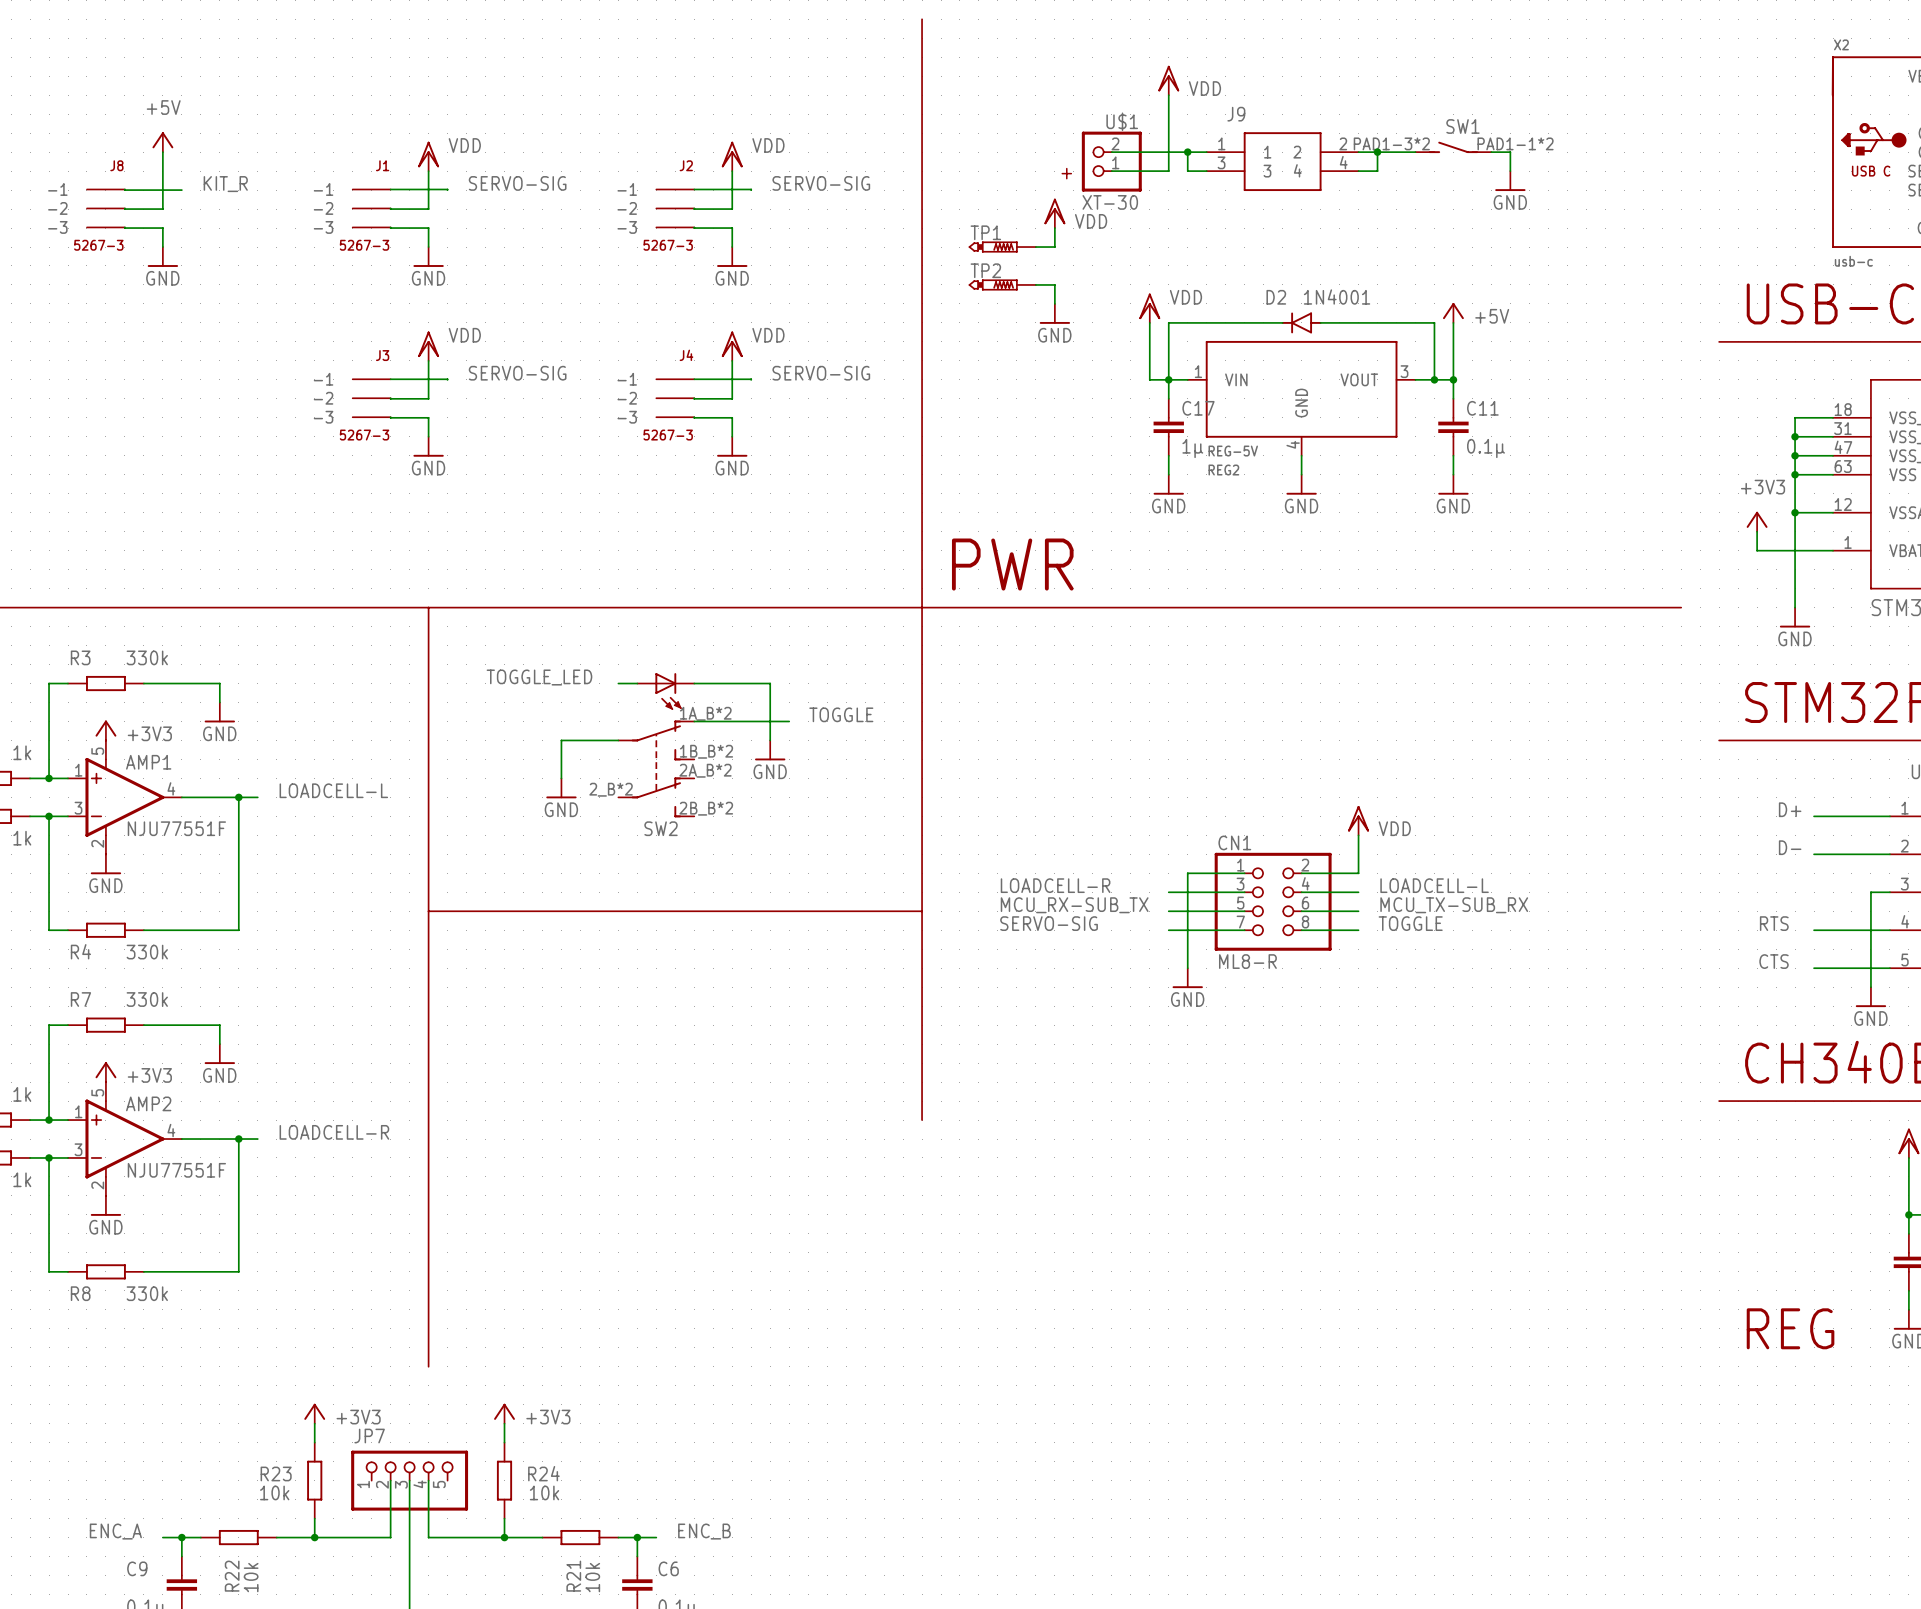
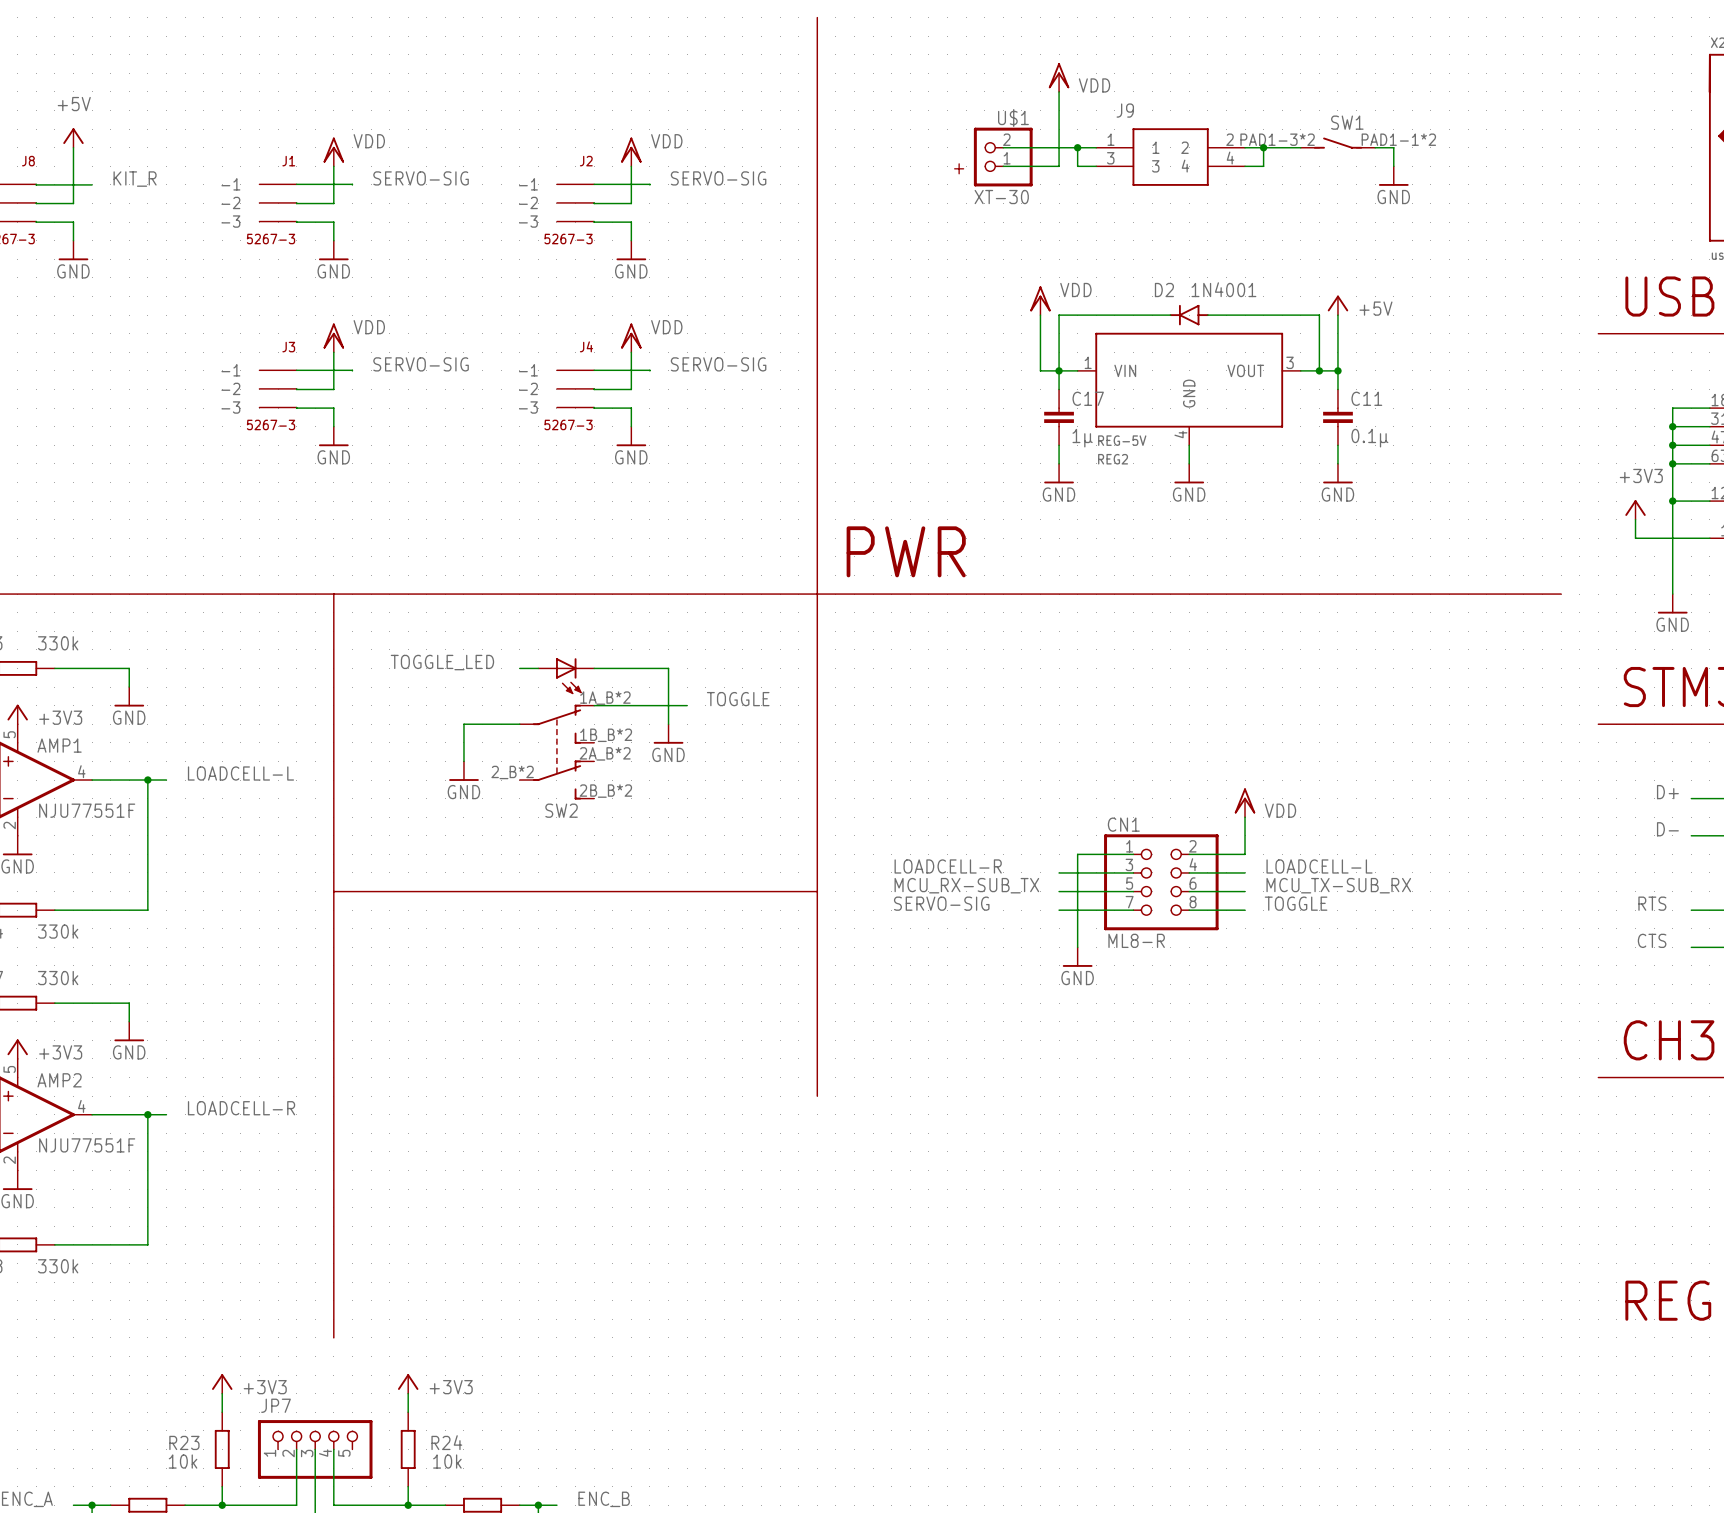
power symbol: VDD (1054, 213) -> none
wire: (1054, 228) (1054, 247) (1035, 247) -> none
TP1: (1002, 247) -> none
TP2: (1002, 284) -> none
wire: (1035, 284) (1054, 284) (1054, 303) -> none
power symbol: GND (1054, 313) -> none

